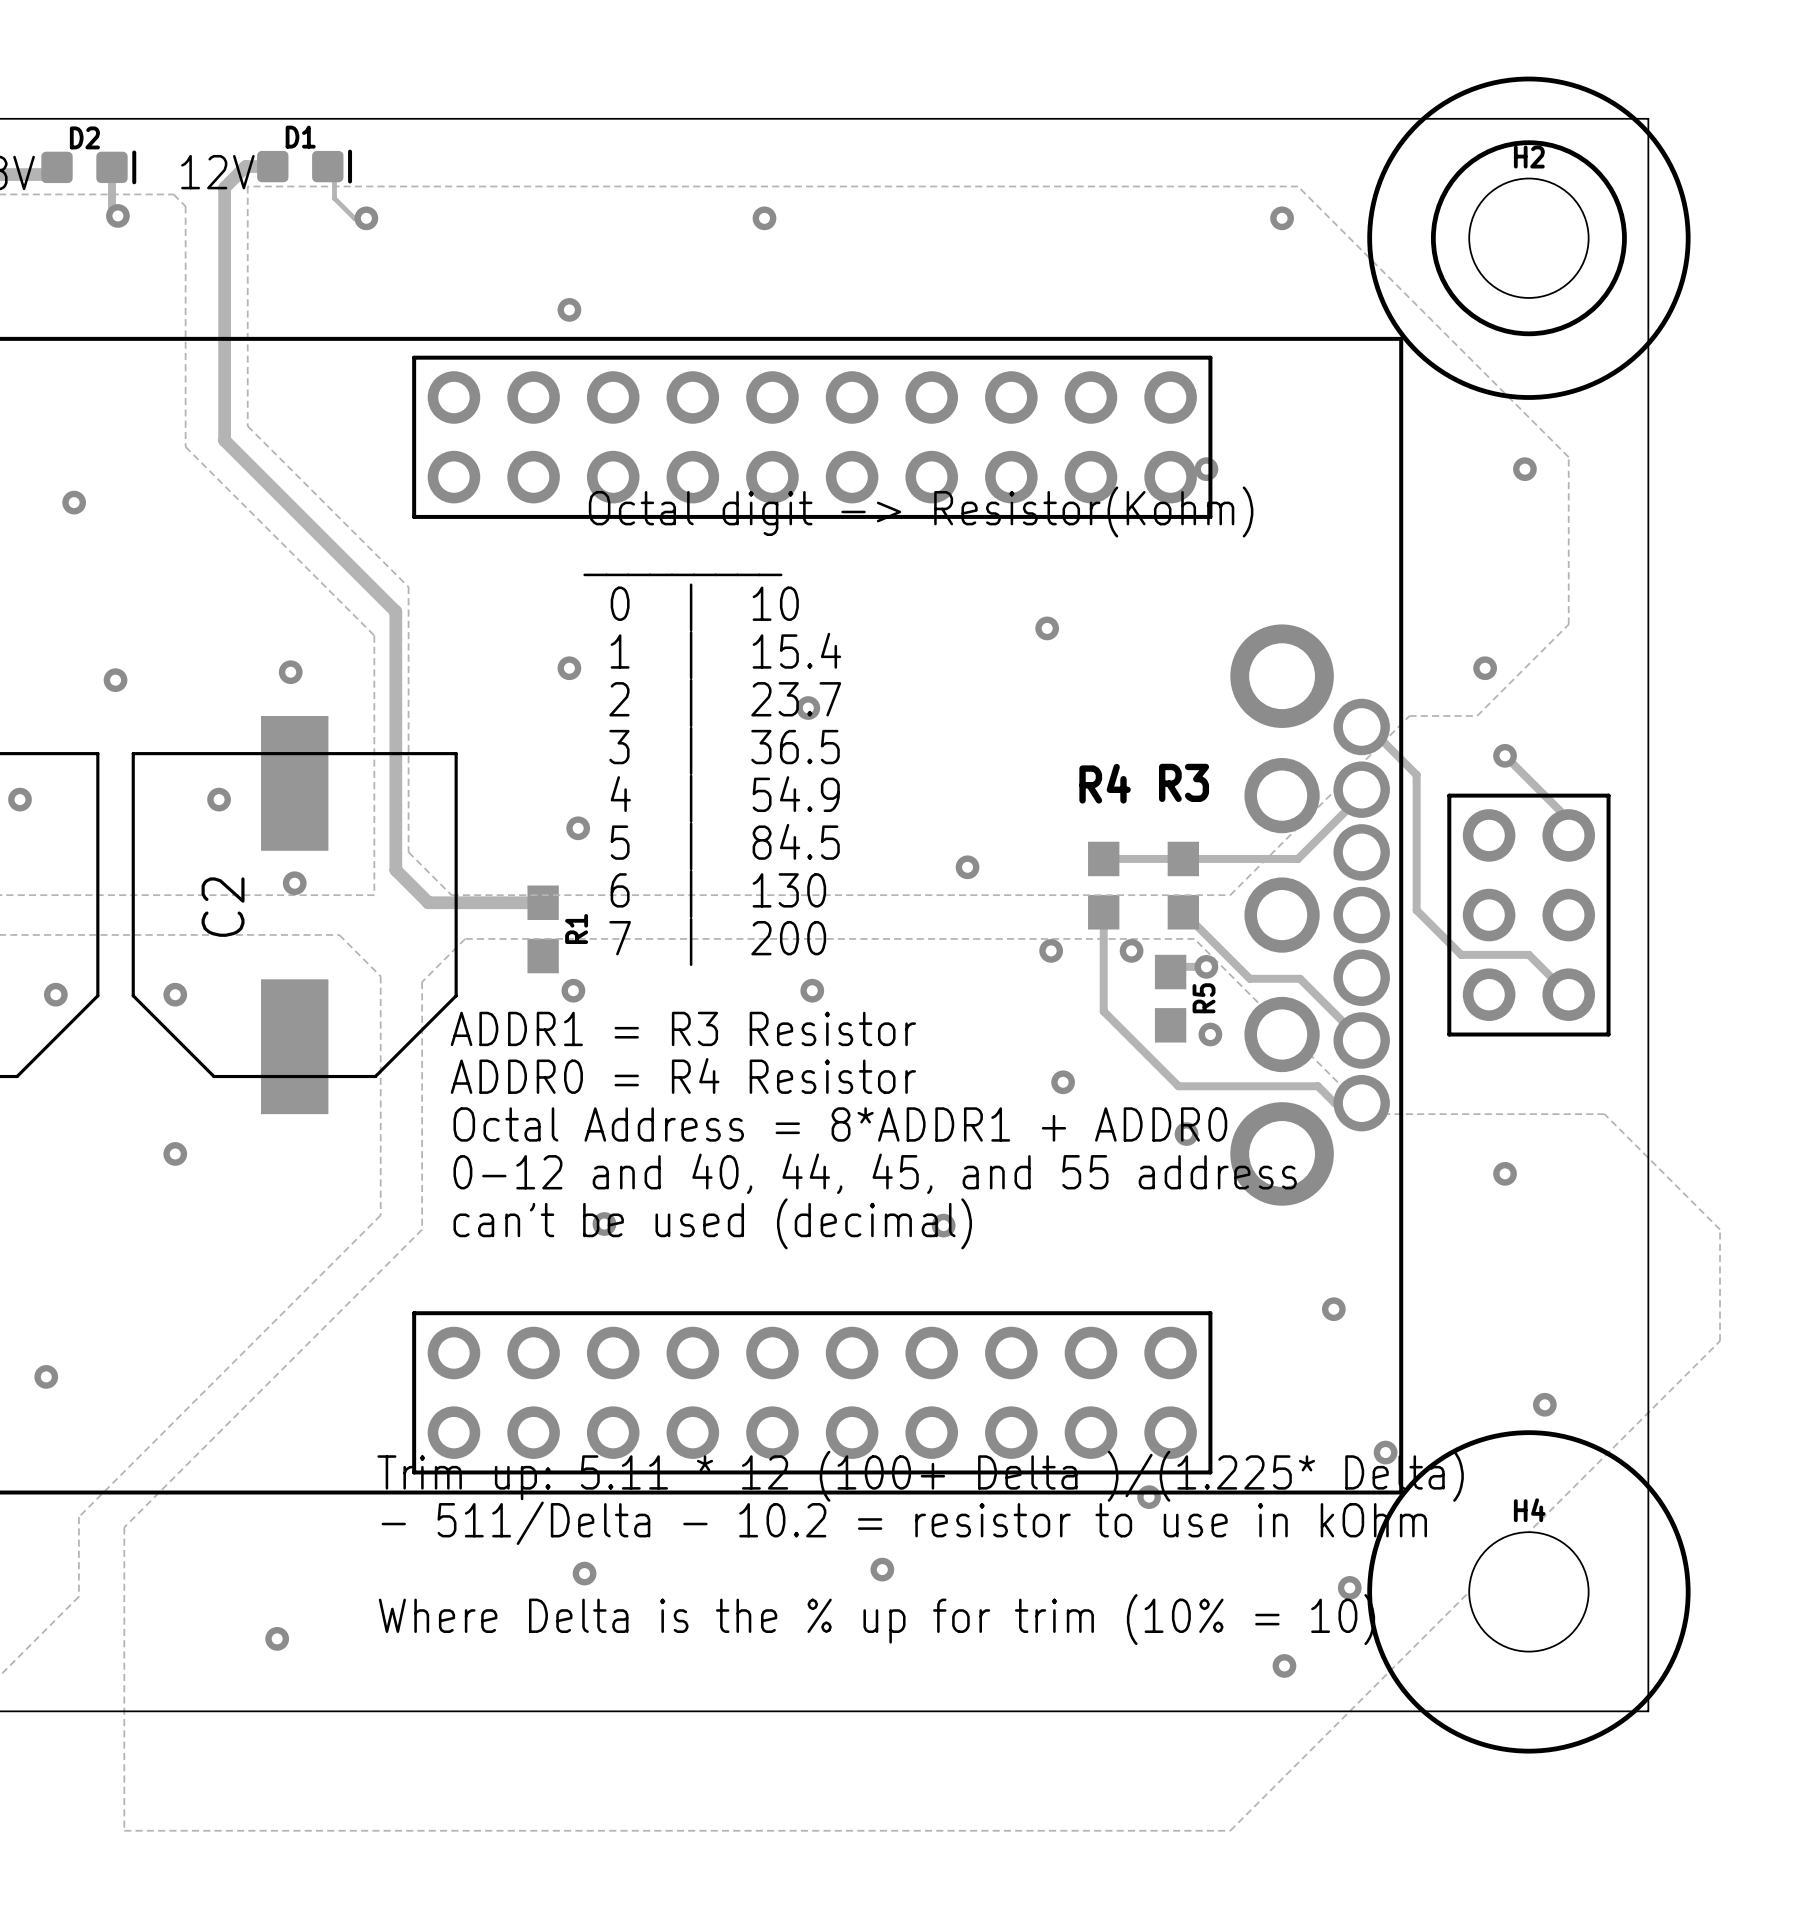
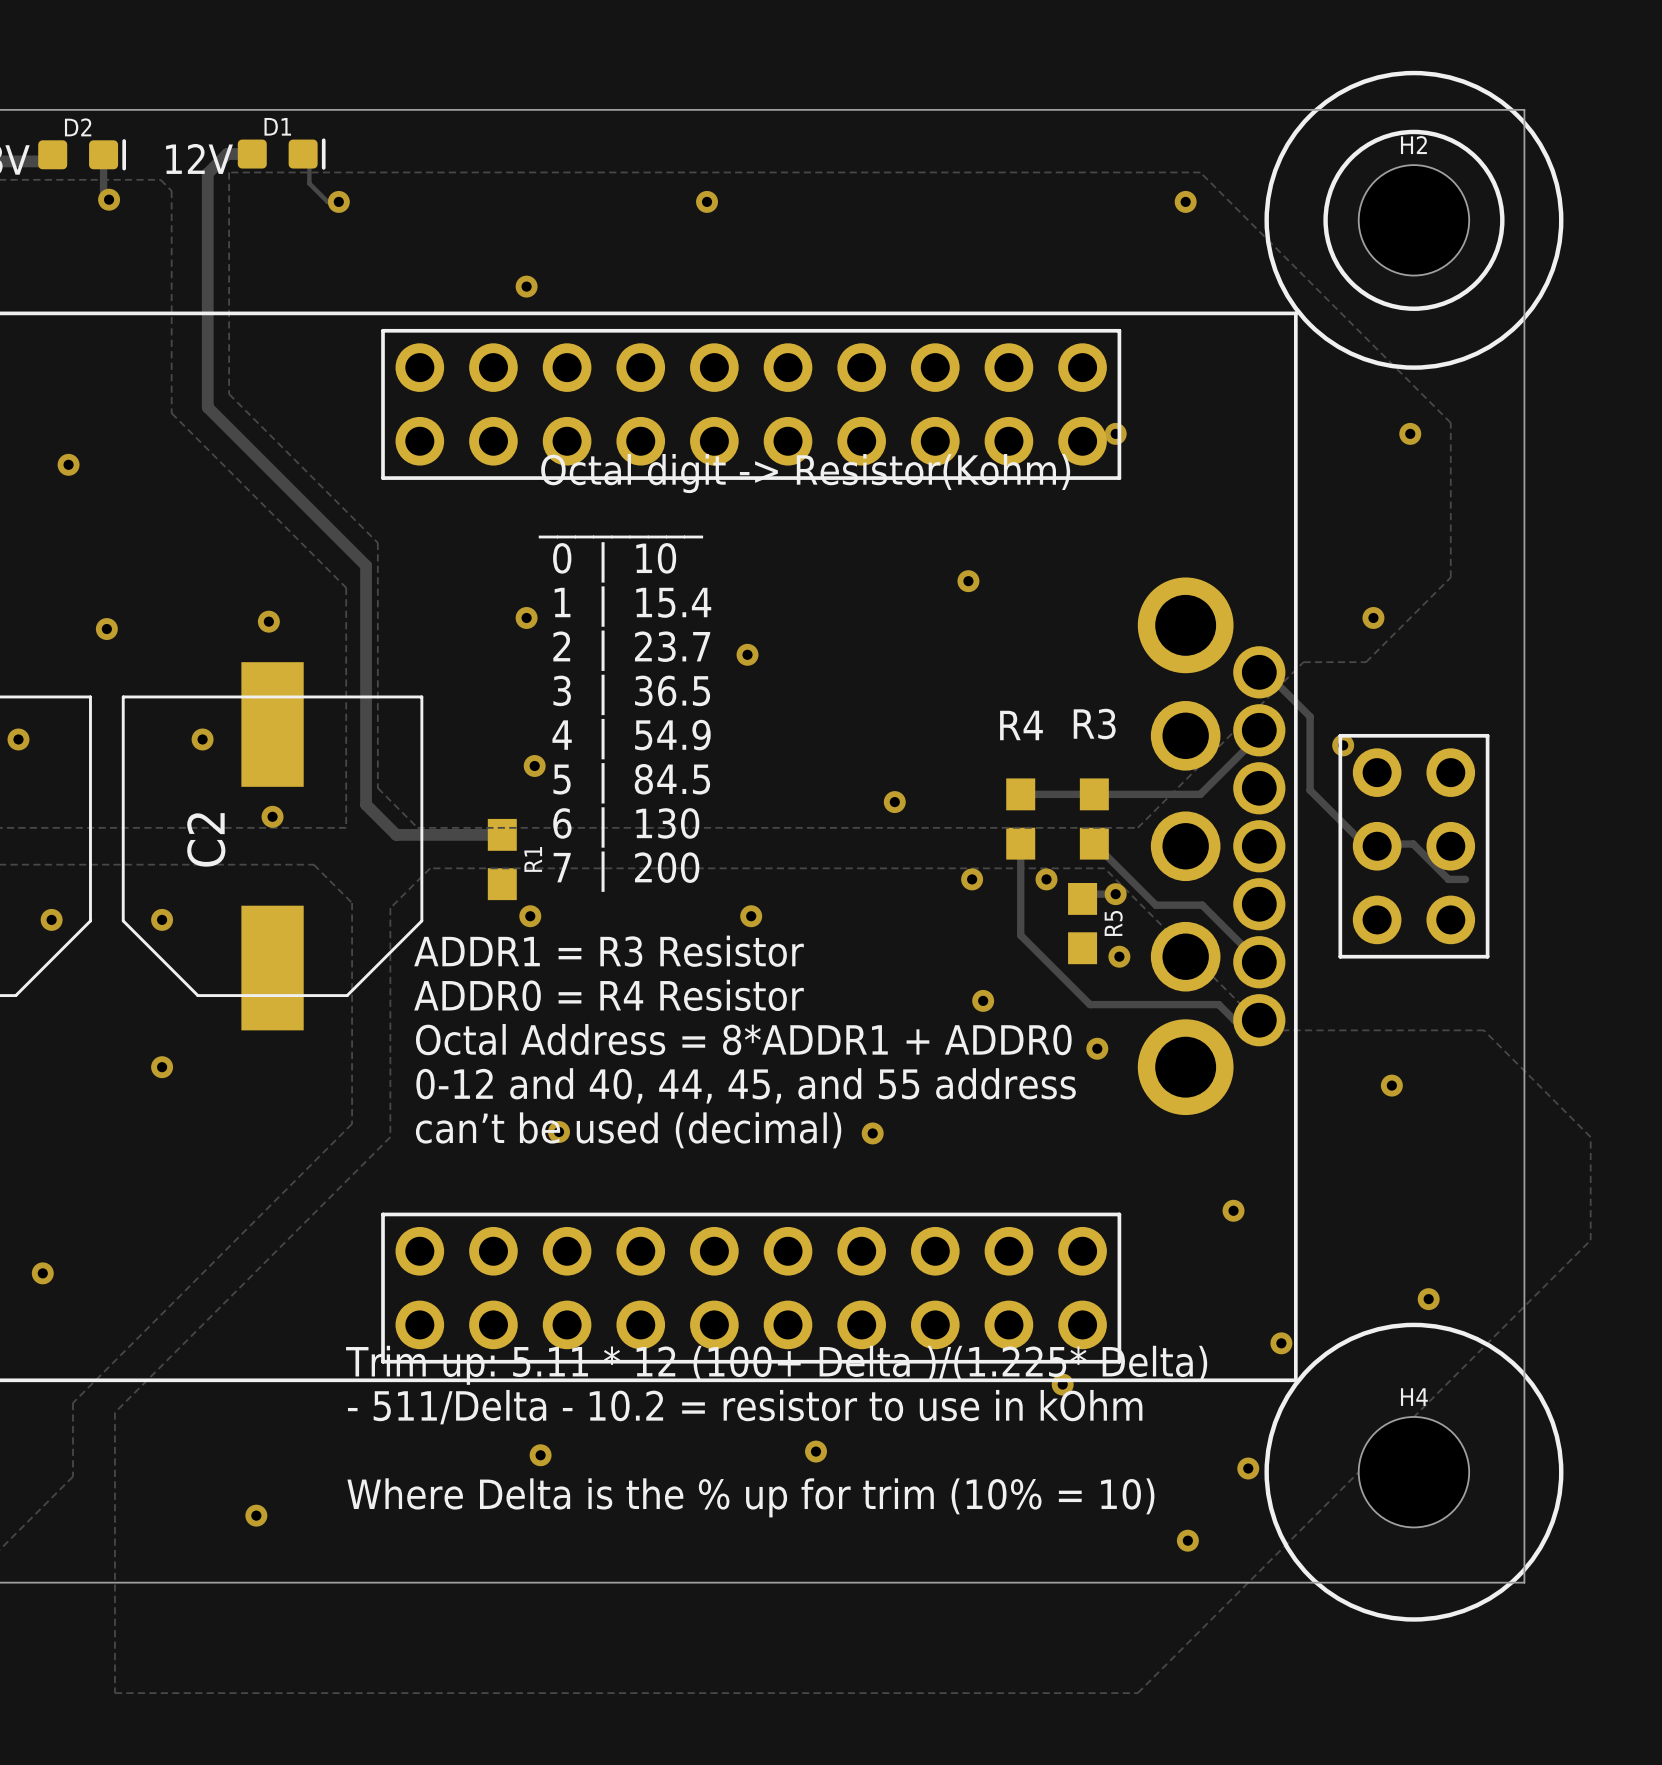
track: (1505, 755) (1568, 819) (1568, 835) -> none
via position: (1505, 755) -> (1343, 745)
track: (1416, 854) (1416, 910) (1461, 954) (1528, 954) (1568, 994) -> (1310, 790) (1363, 844) (1413, 844) (1448, 879) (1465, 879)

